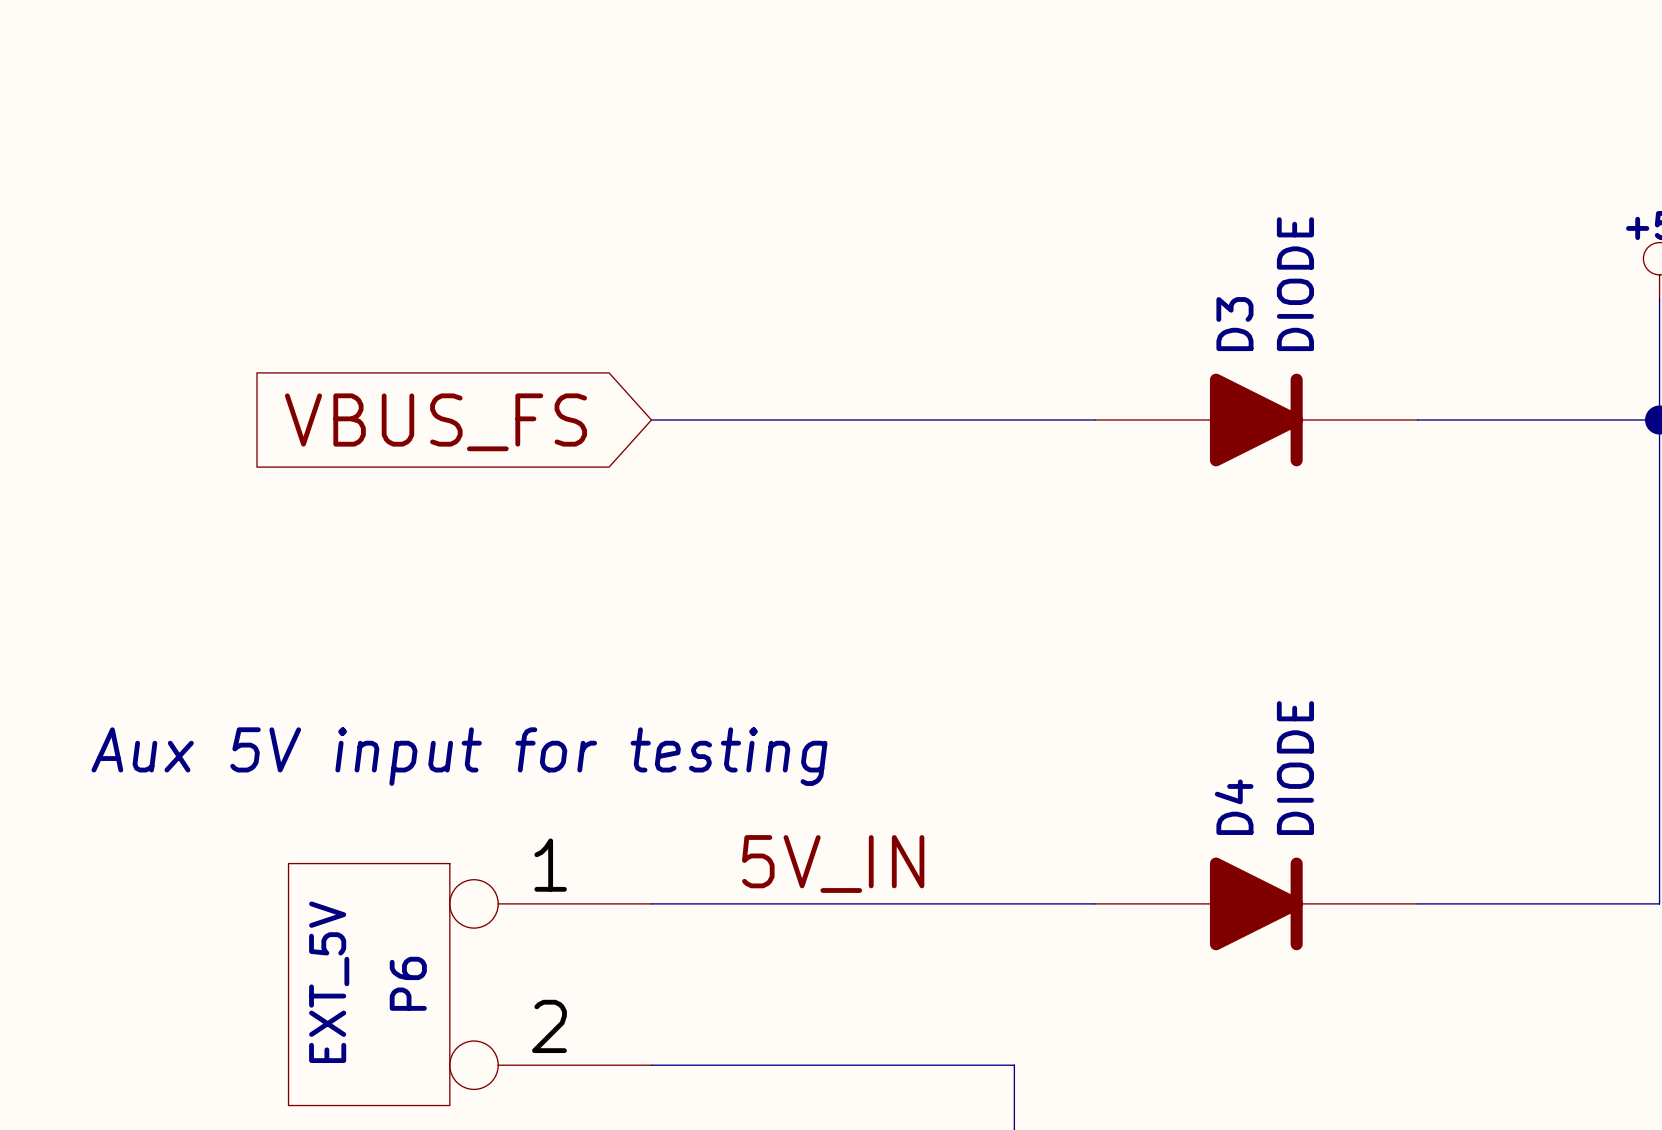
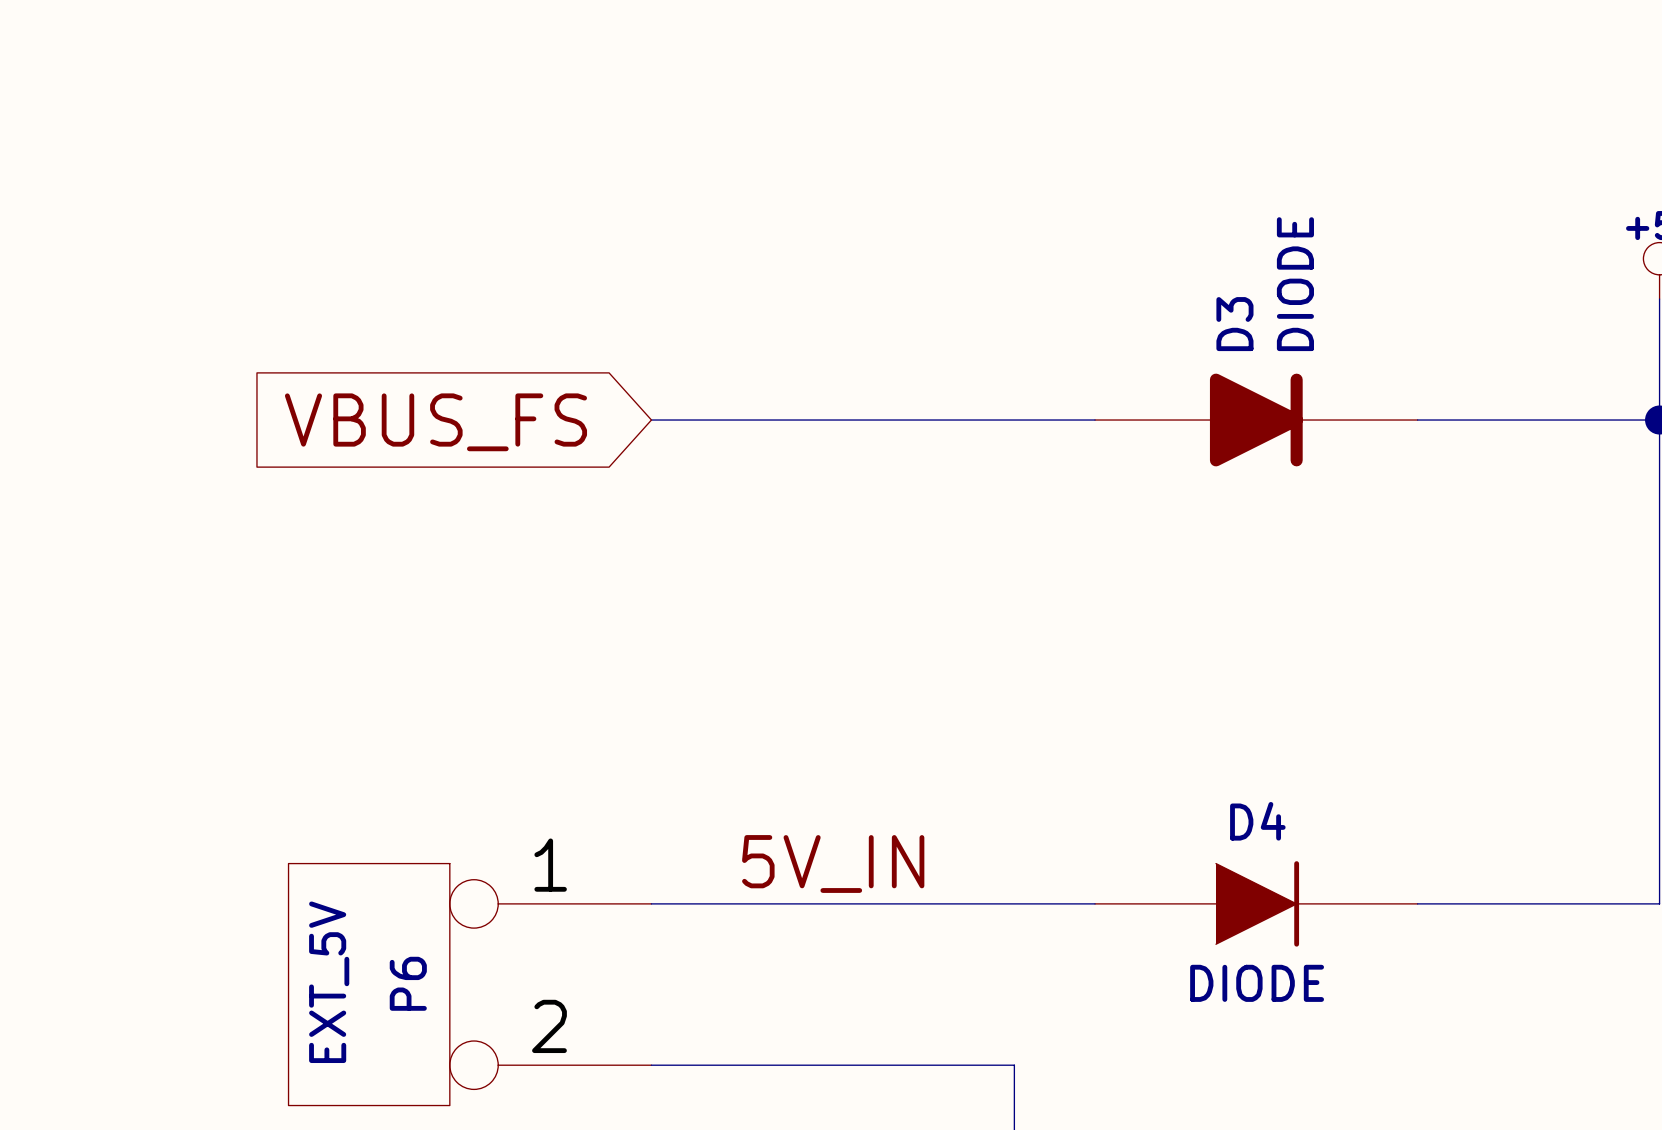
text: Aux 5V input for testing (459, 756) -> none
D4 value rotation: 0° (1295, 768) -> 90° clockwise (1257, 983)
D4 value position: DIODE (1295, 768) -> DIODE (1257, 983)
D4 name rotation: 0° (1234, 807) -> 90° clockwise (1257, 821)
D4 symbol: [1095, 857, 1418, 951] -> [1095, 861, 1418, 947]

